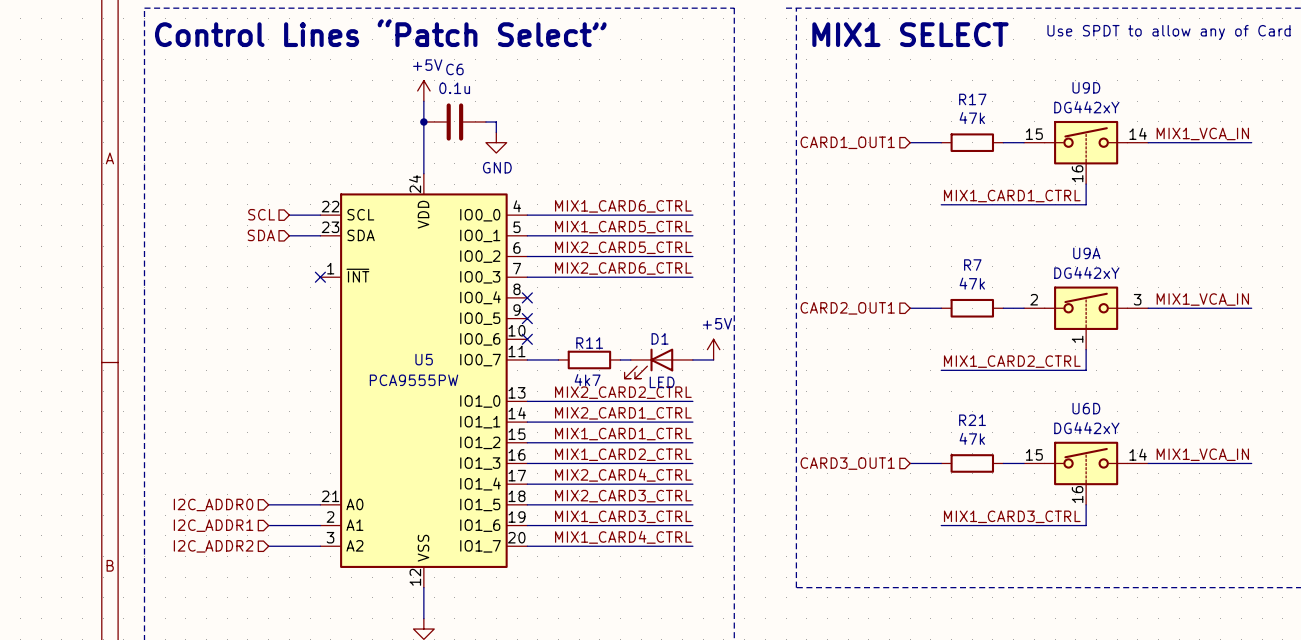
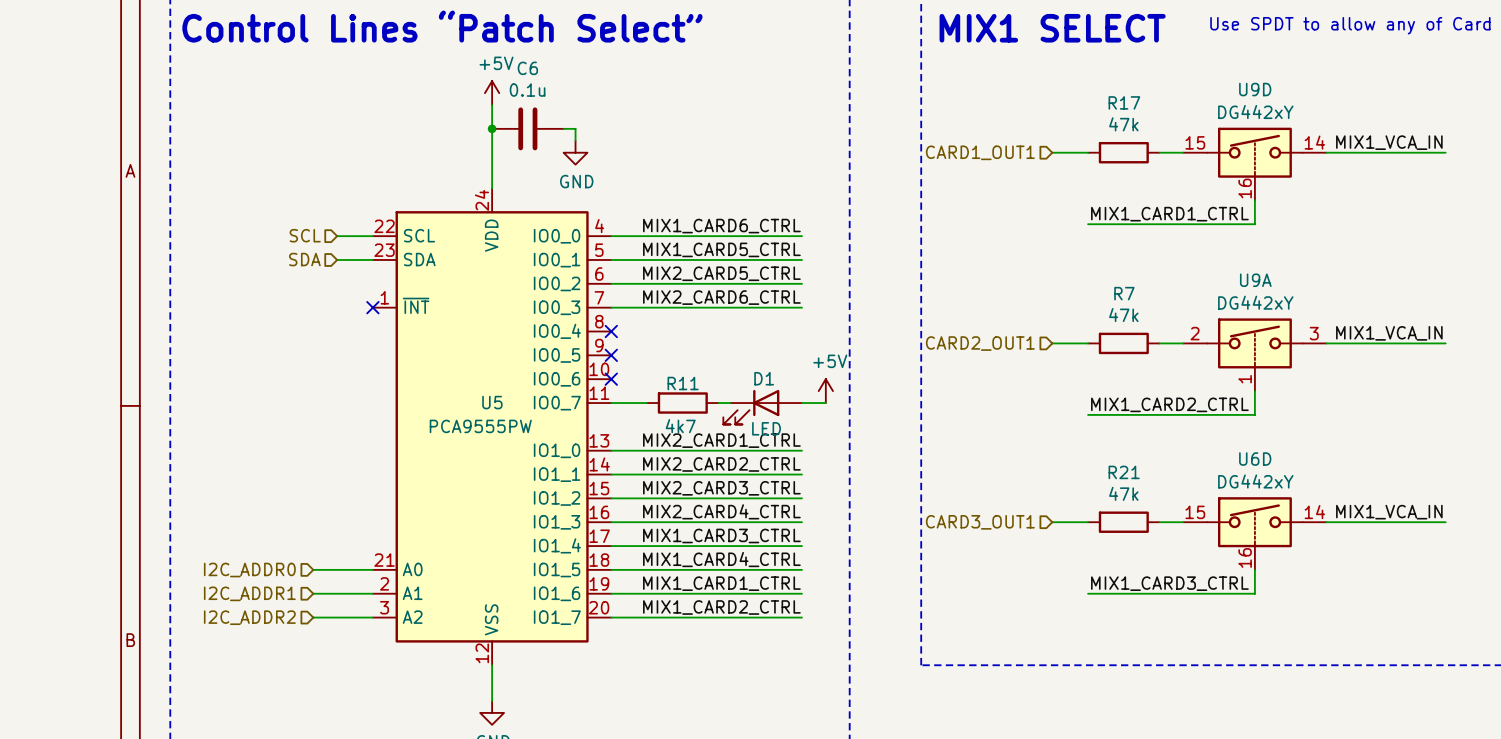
label: MIX2_CARD2_CTRL (623, 392) -> MIX2_CARD1_CTRL (721, 440)
label: MIX2_CARD1_CTRL (623, 413) -> MIX2_CARD2_CTRL (721, 464)
label: MIX1_CARD1_CTRL (623, 434) -> MIX2_CARD3_CTRL (721, 488)
label: MIX1_CARD2_CTRL (623, 454) -> MIX2_CARD4_CTRL (721, 511)
label: MIX2_CARD4_CTRL (623, 475) -> MIX1_CARD3_CTRL (721, 535)
label: MIX2_CARD3_CTRL (623, 496) -> MIX1_CARD4_CTRL (721, 559)
label: MIX1_CARD3_CTRL (623, 516) -> MIX1_CARD1_CTRL (721, 583)
label: MIX1_CARD4_CTRL (623, 537) -> MIX1_CARD2_CTRL (721, 607)

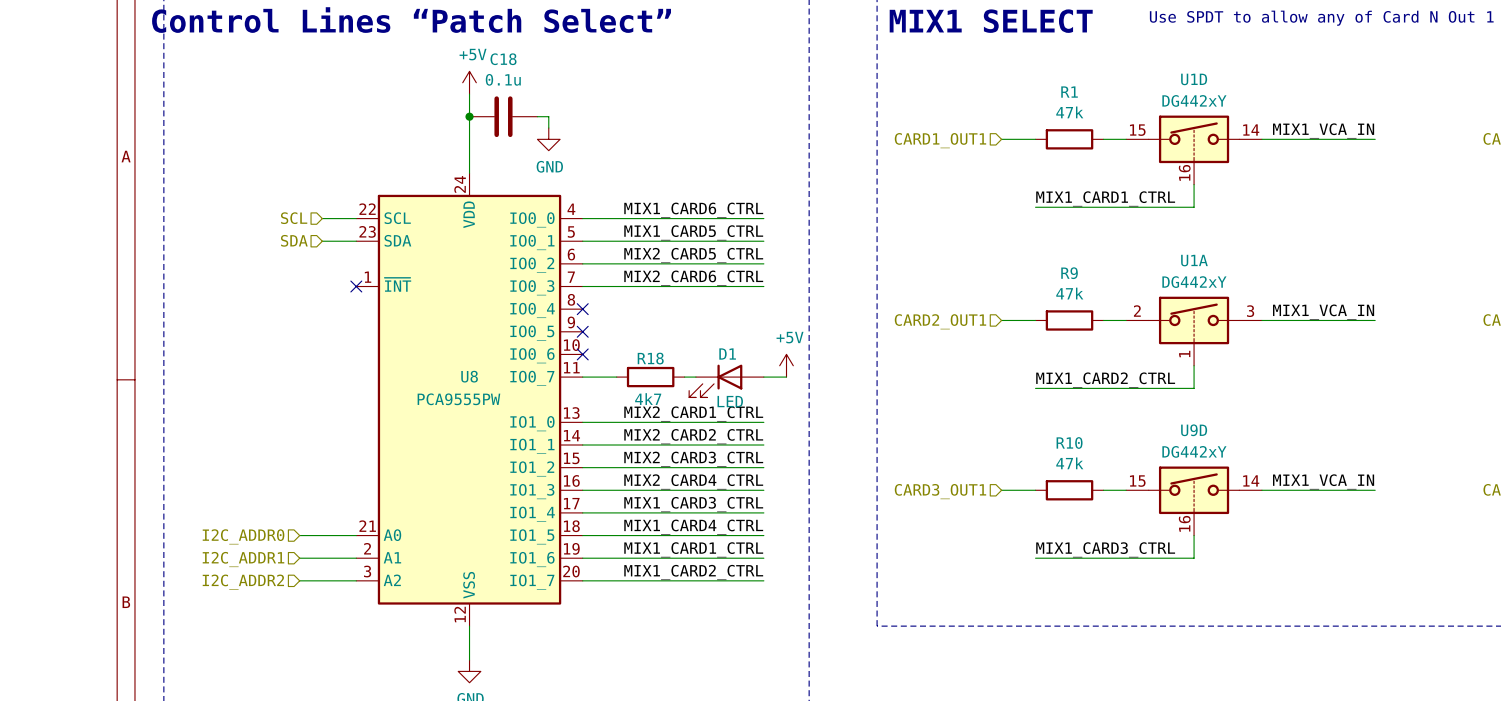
C6 name: C6 (527, 68) -> C18 (503, 59)
U9D name: U9D (1255, 89) -> U1D (1194, 79)
R17 name: R17 (1124, 102) -> R1 (1069, 92)
U9A name: U9A (1255, 280) -> U1A (1194, 260)
R7 name: R7 (1124, 293) -> R9 (1069, 273)
R11 name: R11 (683, 383) -> R18 (650, 358)
U5 name: U5 (492, 402) -> U8 (469, 376)
U6D name: U6D (1255, 459) -> U9D (1194, 430)
R21 name: R21 (1124, 472) -> R10 (1069, 443)

